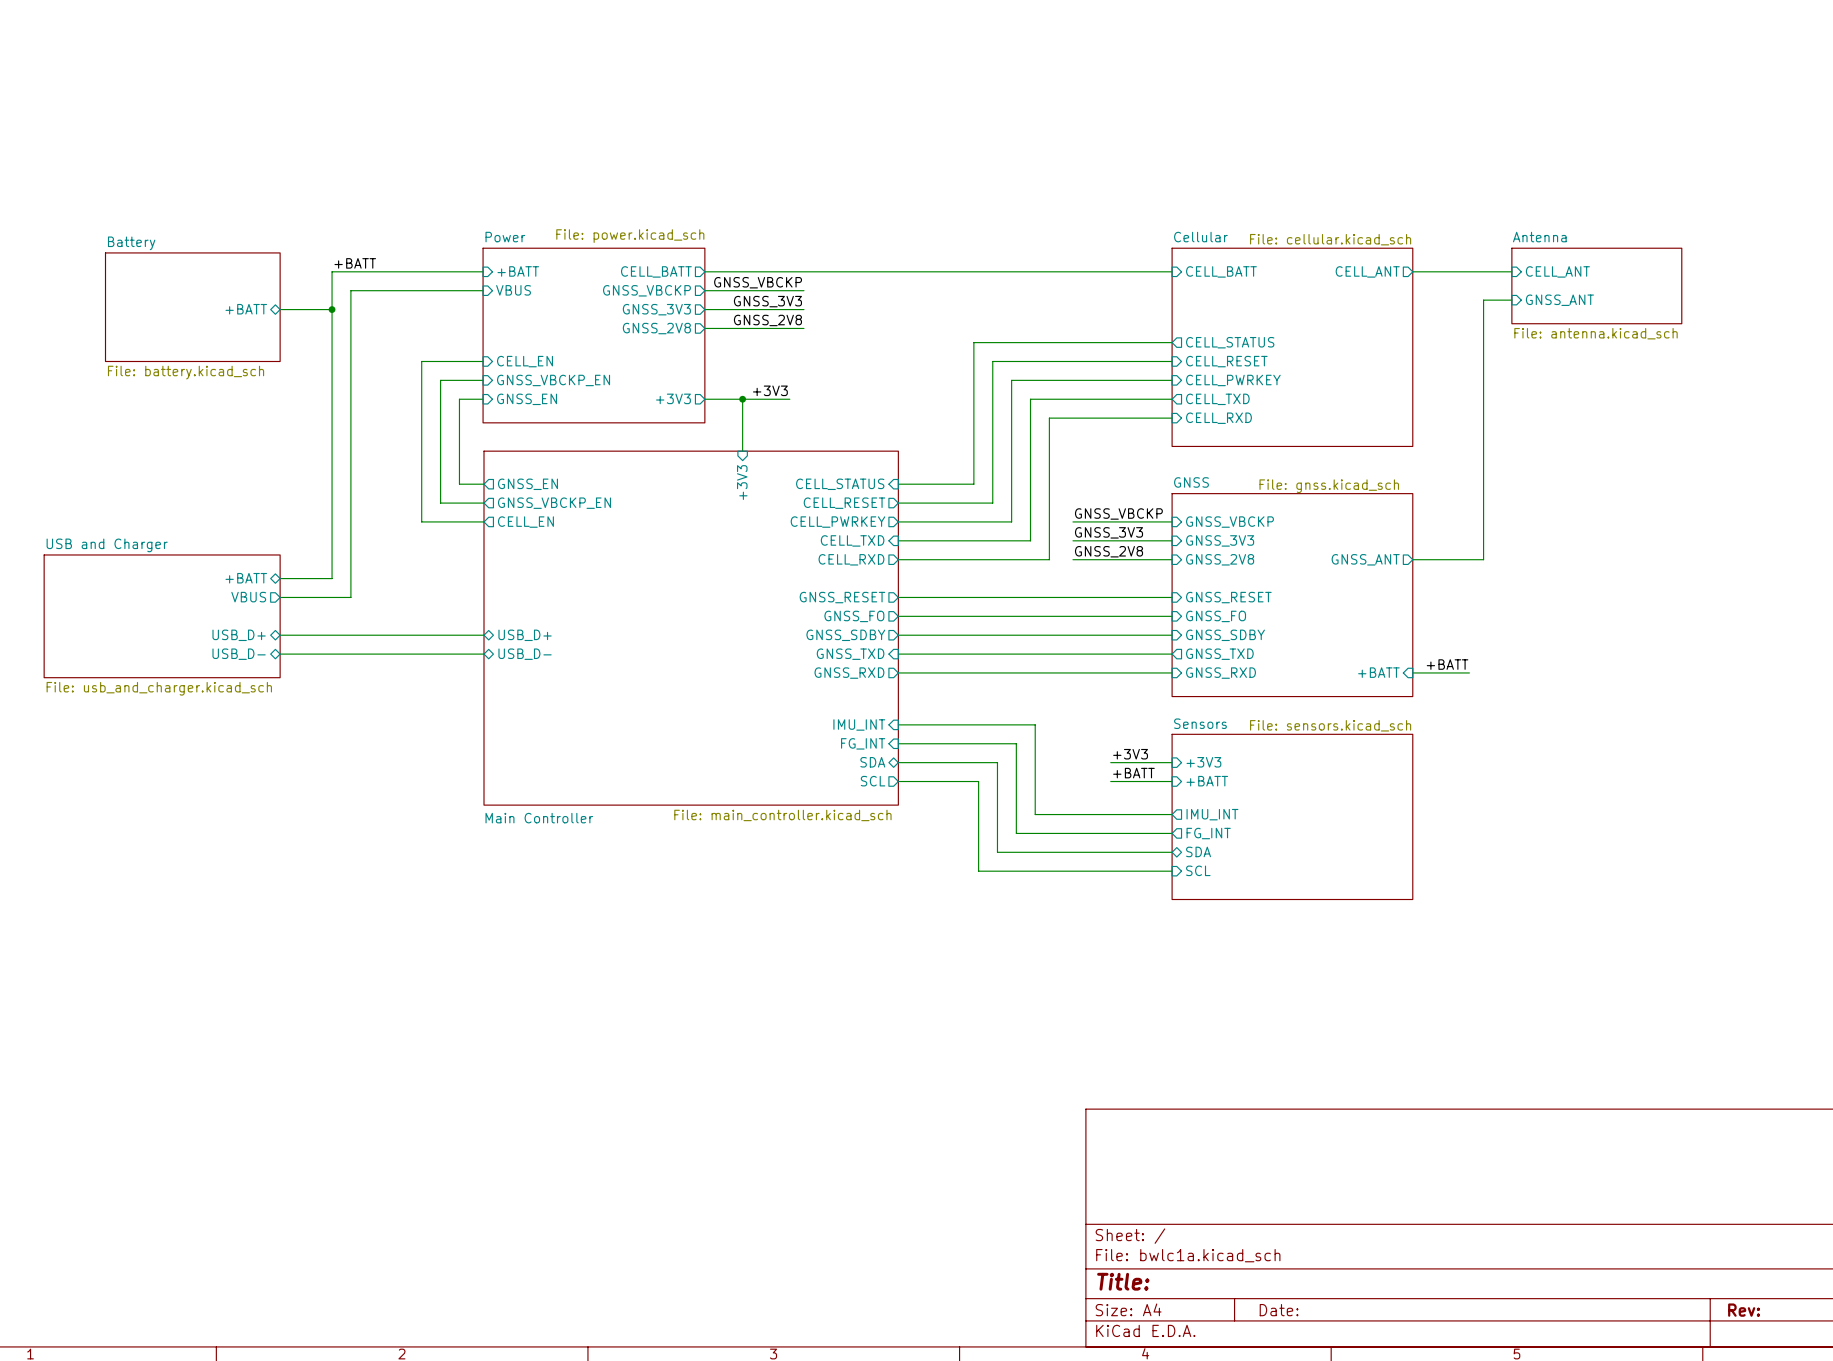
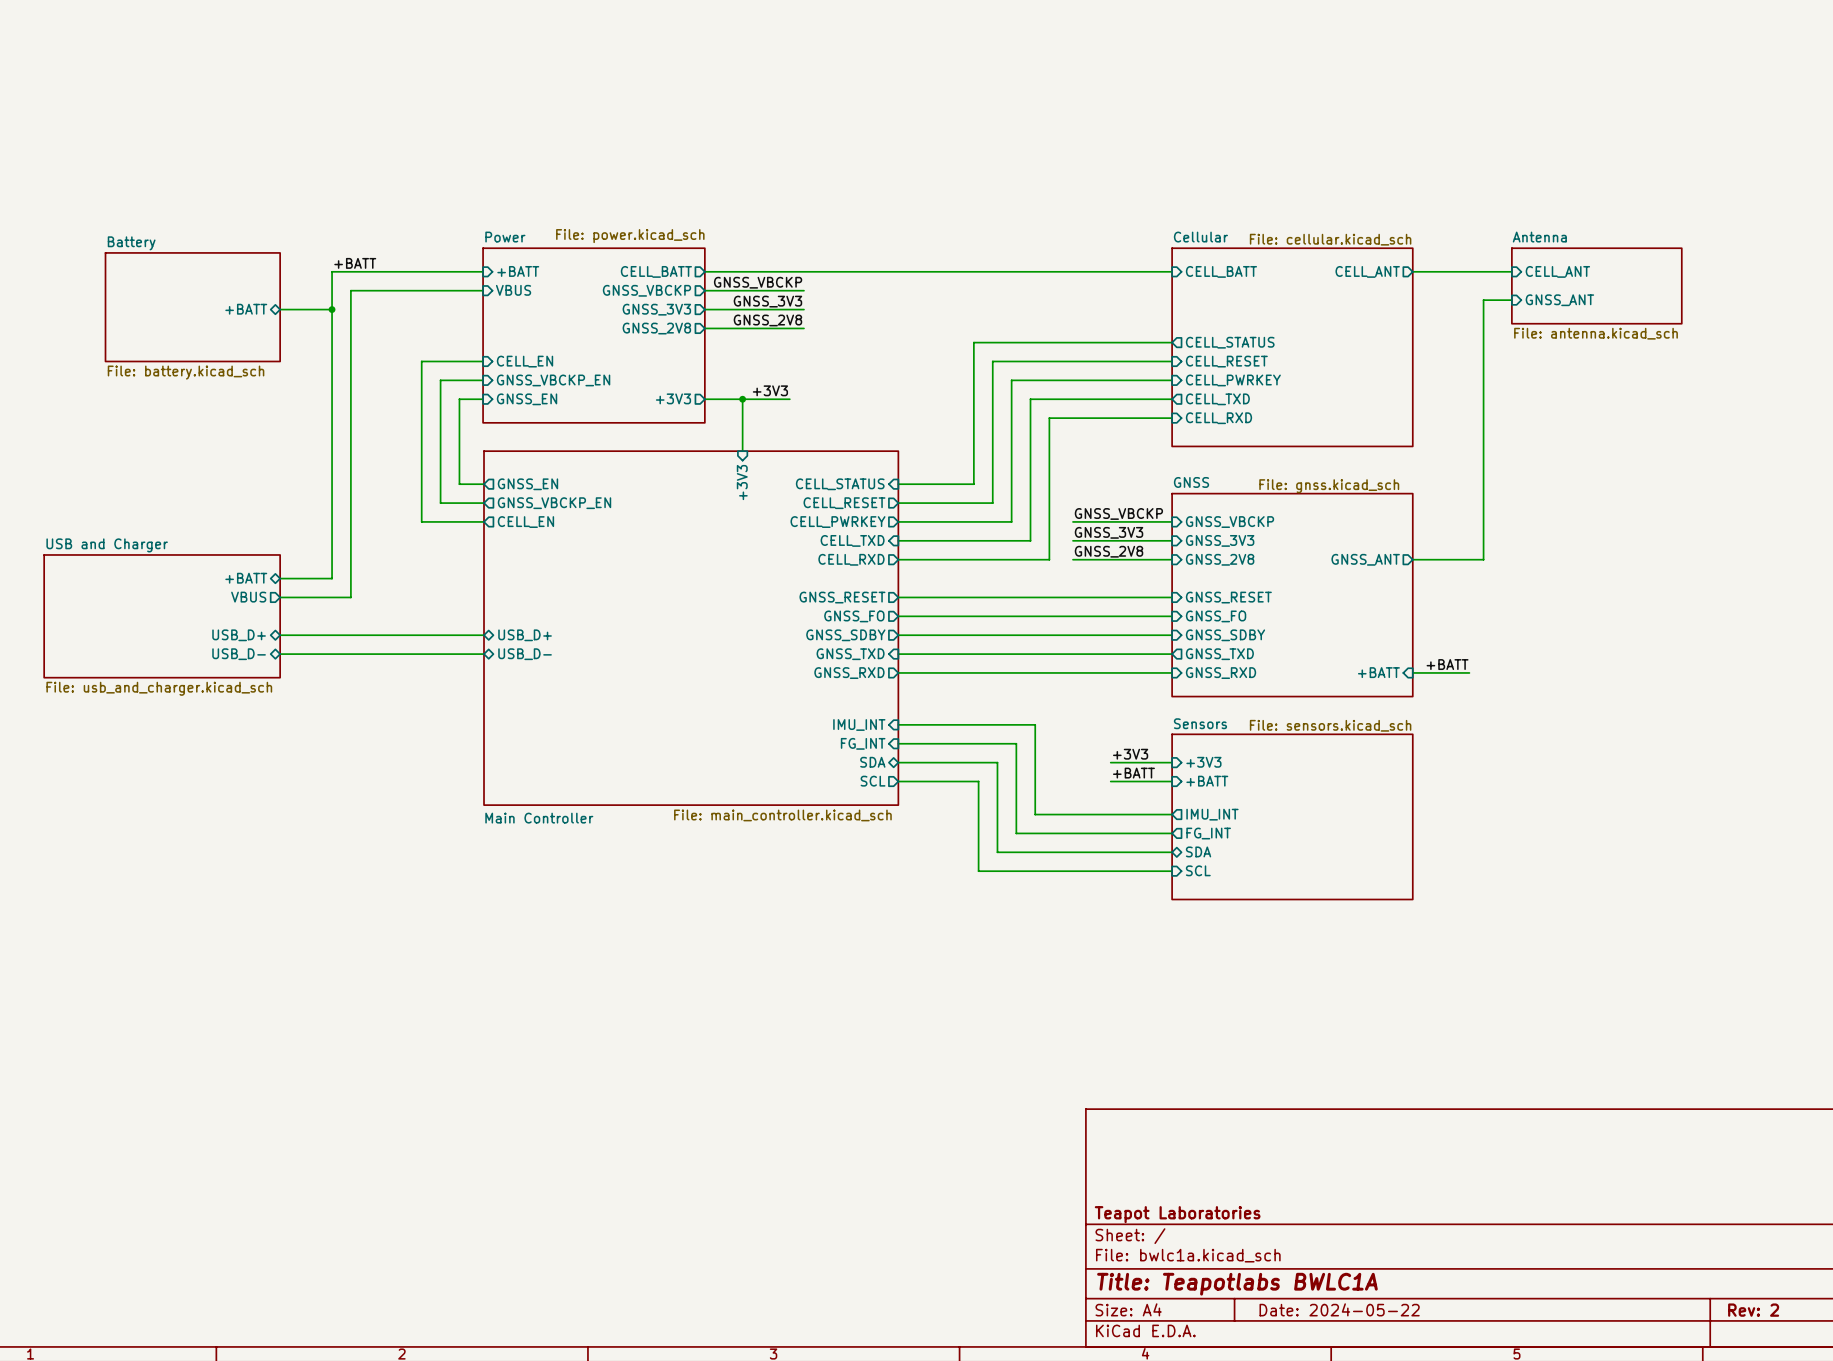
title block: none -> Teapot Laboratories (1177, 1214)
title block: Title: (1123, 1281) -> Title: Teapotlabs BWLC1A (1237, 1284)
title block: Date: (1279, 1310) -> Date: 2024-05-22 (1339, 1309)
title block: Rev: (1744, 1310) -> Rev: 2 (1753, 1310)

